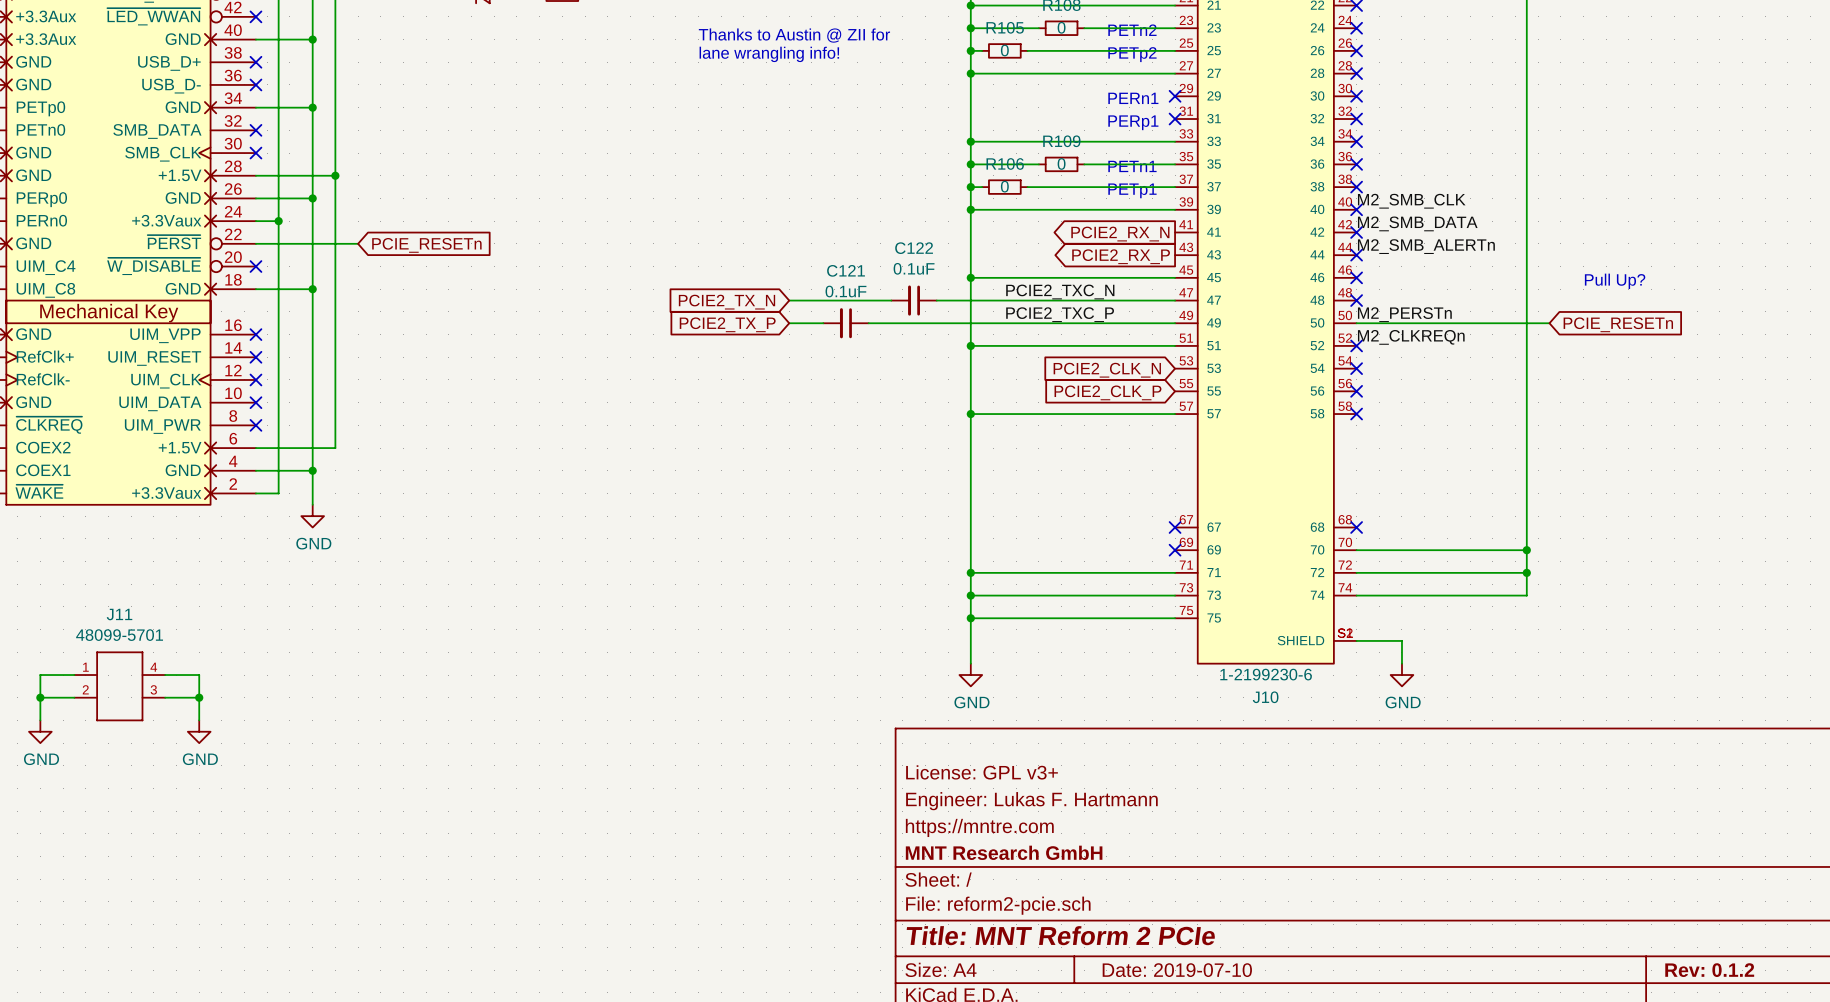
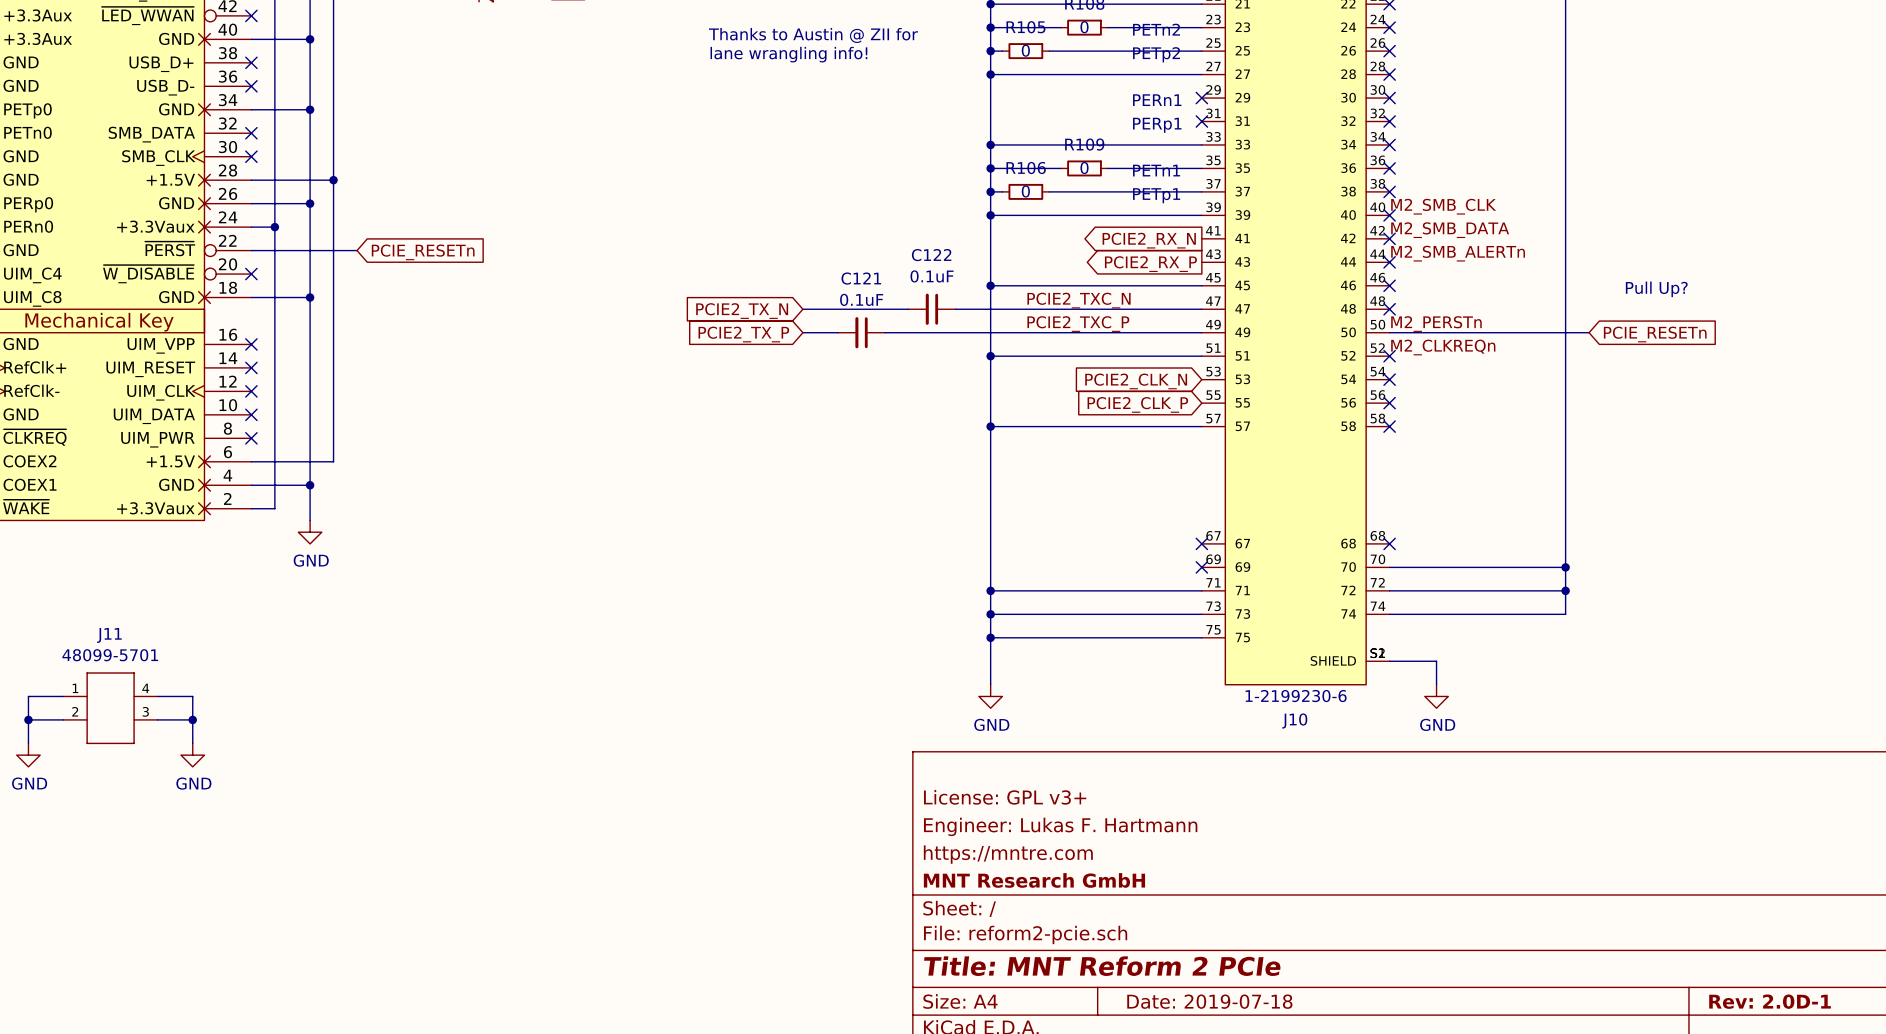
title block: Date: 2019-07-10 (1177, 970) -> Date: 2019-07-18 (1209, 1001)
title block: Rev: 0.1.2 (1709, 970) -> Rev: 2.0D-1 (1770, 1001)

